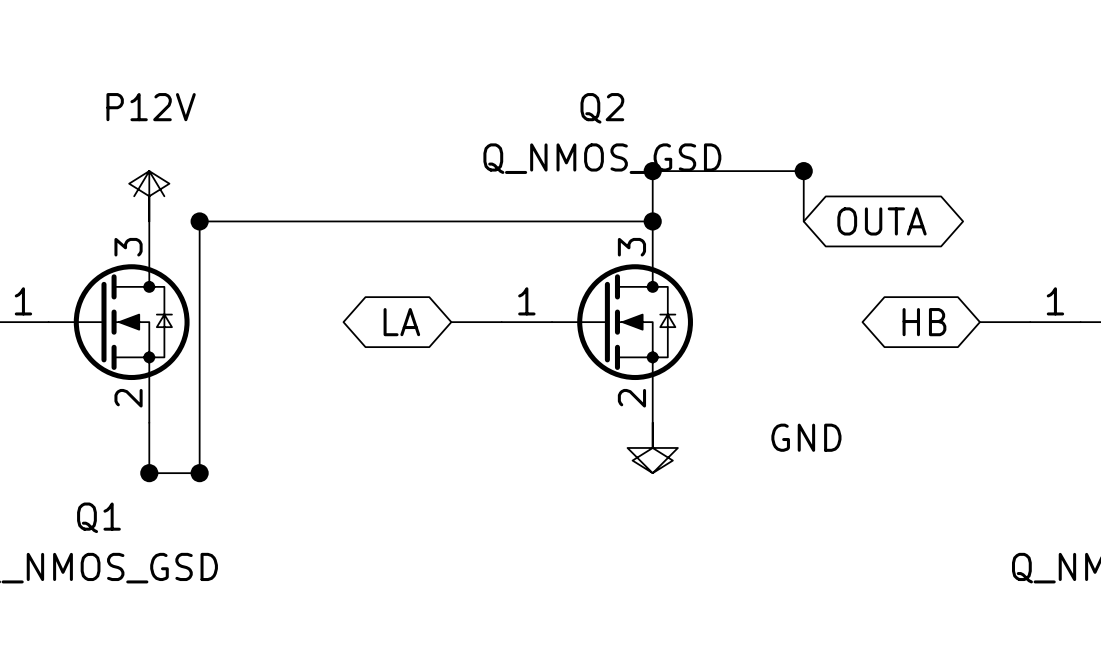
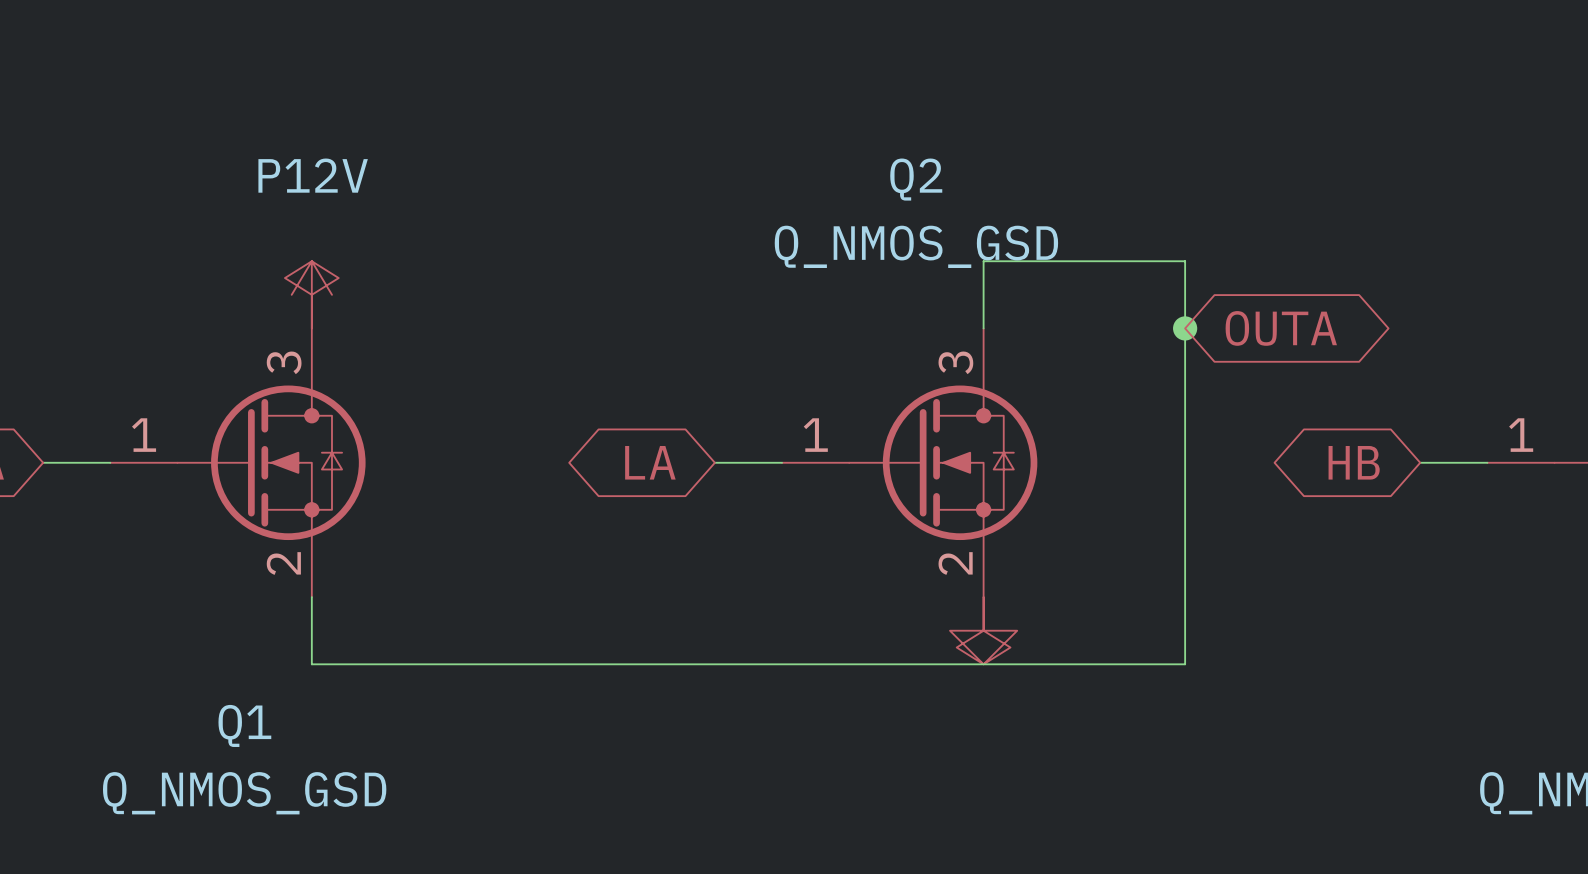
junction: (652, 171) -> none
junction position: (803, 171) -> (1185, 328)
junction: (199, 221) -> none
wire: (652, 221) (199, 221) (199, 473) -> (1185, 328) (1185, 664) (379, 664)
junction: (652, 221) -> none
power symbol text: GND (806, 437) -> none
junction: (149, 473) -> none
junction: (199, 473) -> none

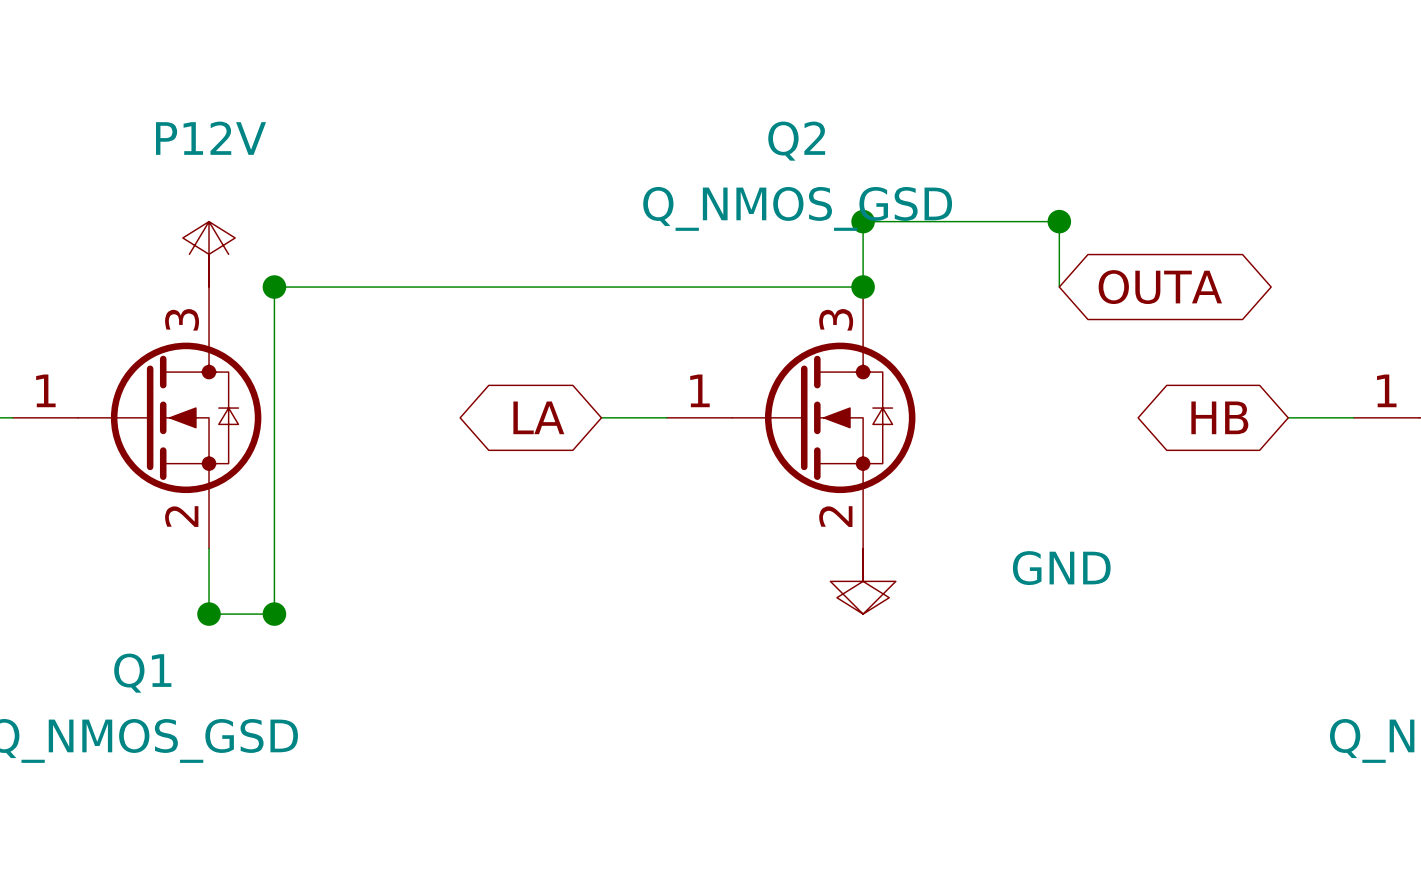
junction: none -> (863, 221)
junction: none -> (274, 287)
junction: none -> (863, 287)
wire: (1185, 328) (1185, 664) (379, 664) -> (863, 287) (274, 287) (274, 614)
junction position: (1185, 328) -> (1059, 221)
power symbol text: none -> GND (1061, 568)
junction: none -> (209, 614)
junction: none -> (274, 614)

